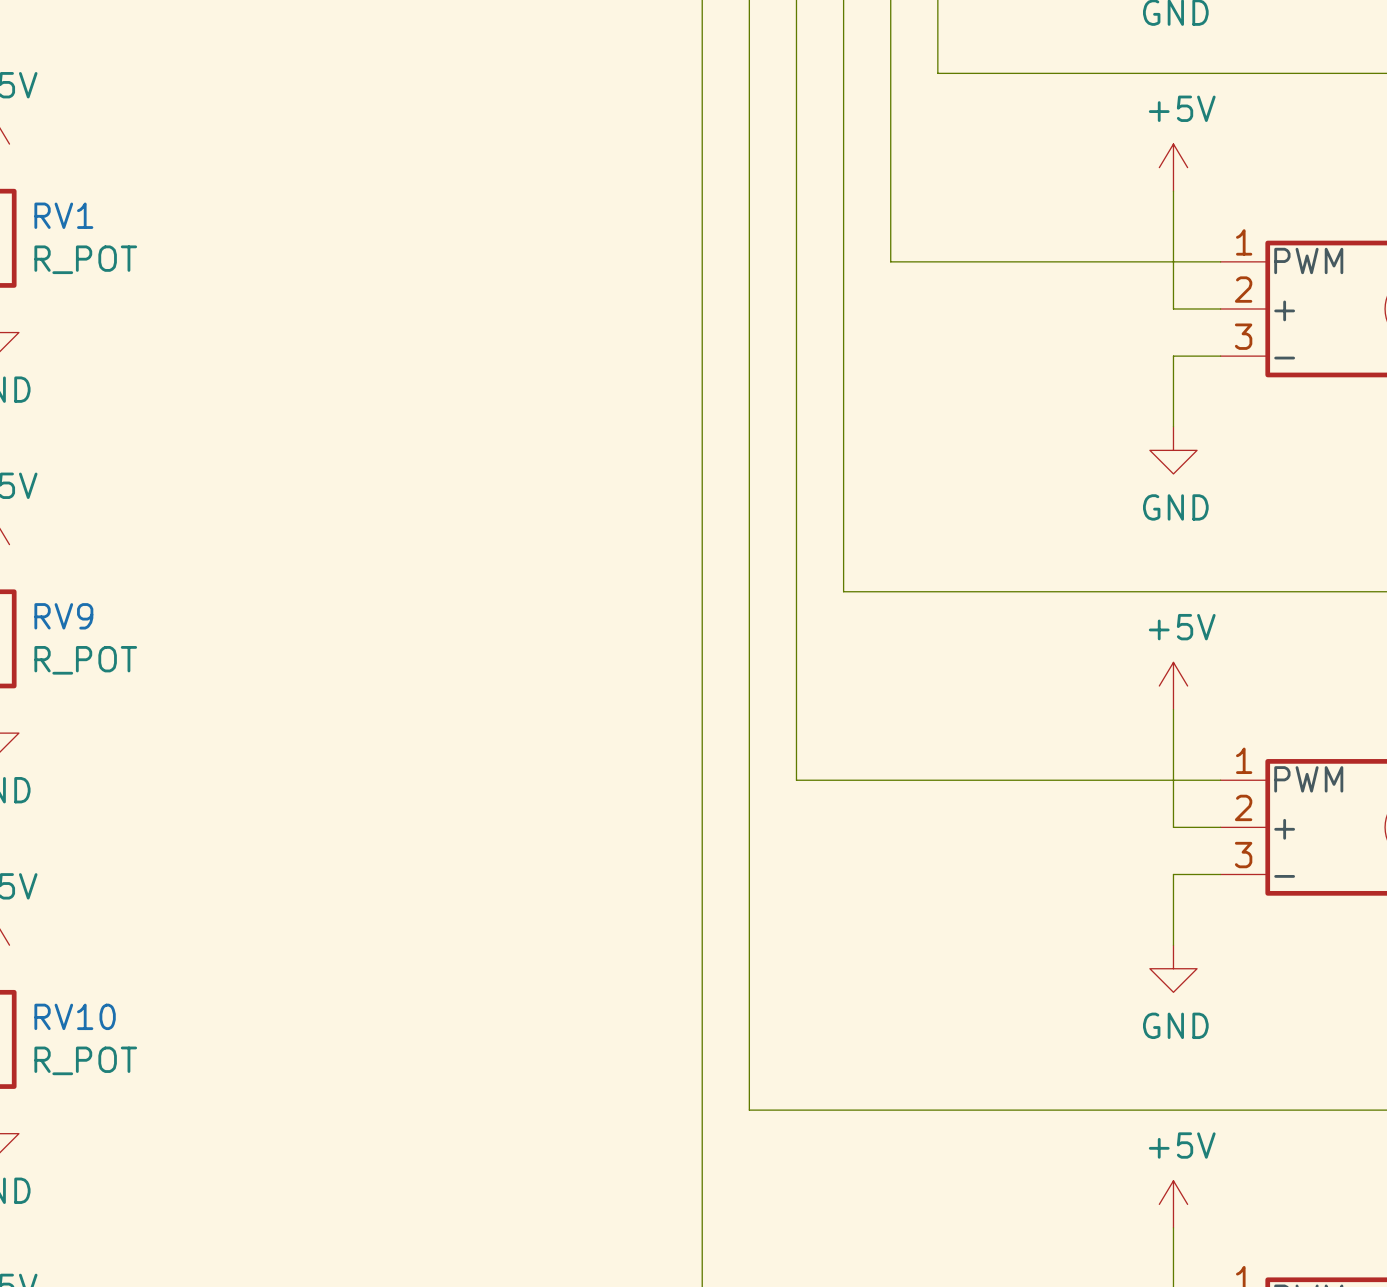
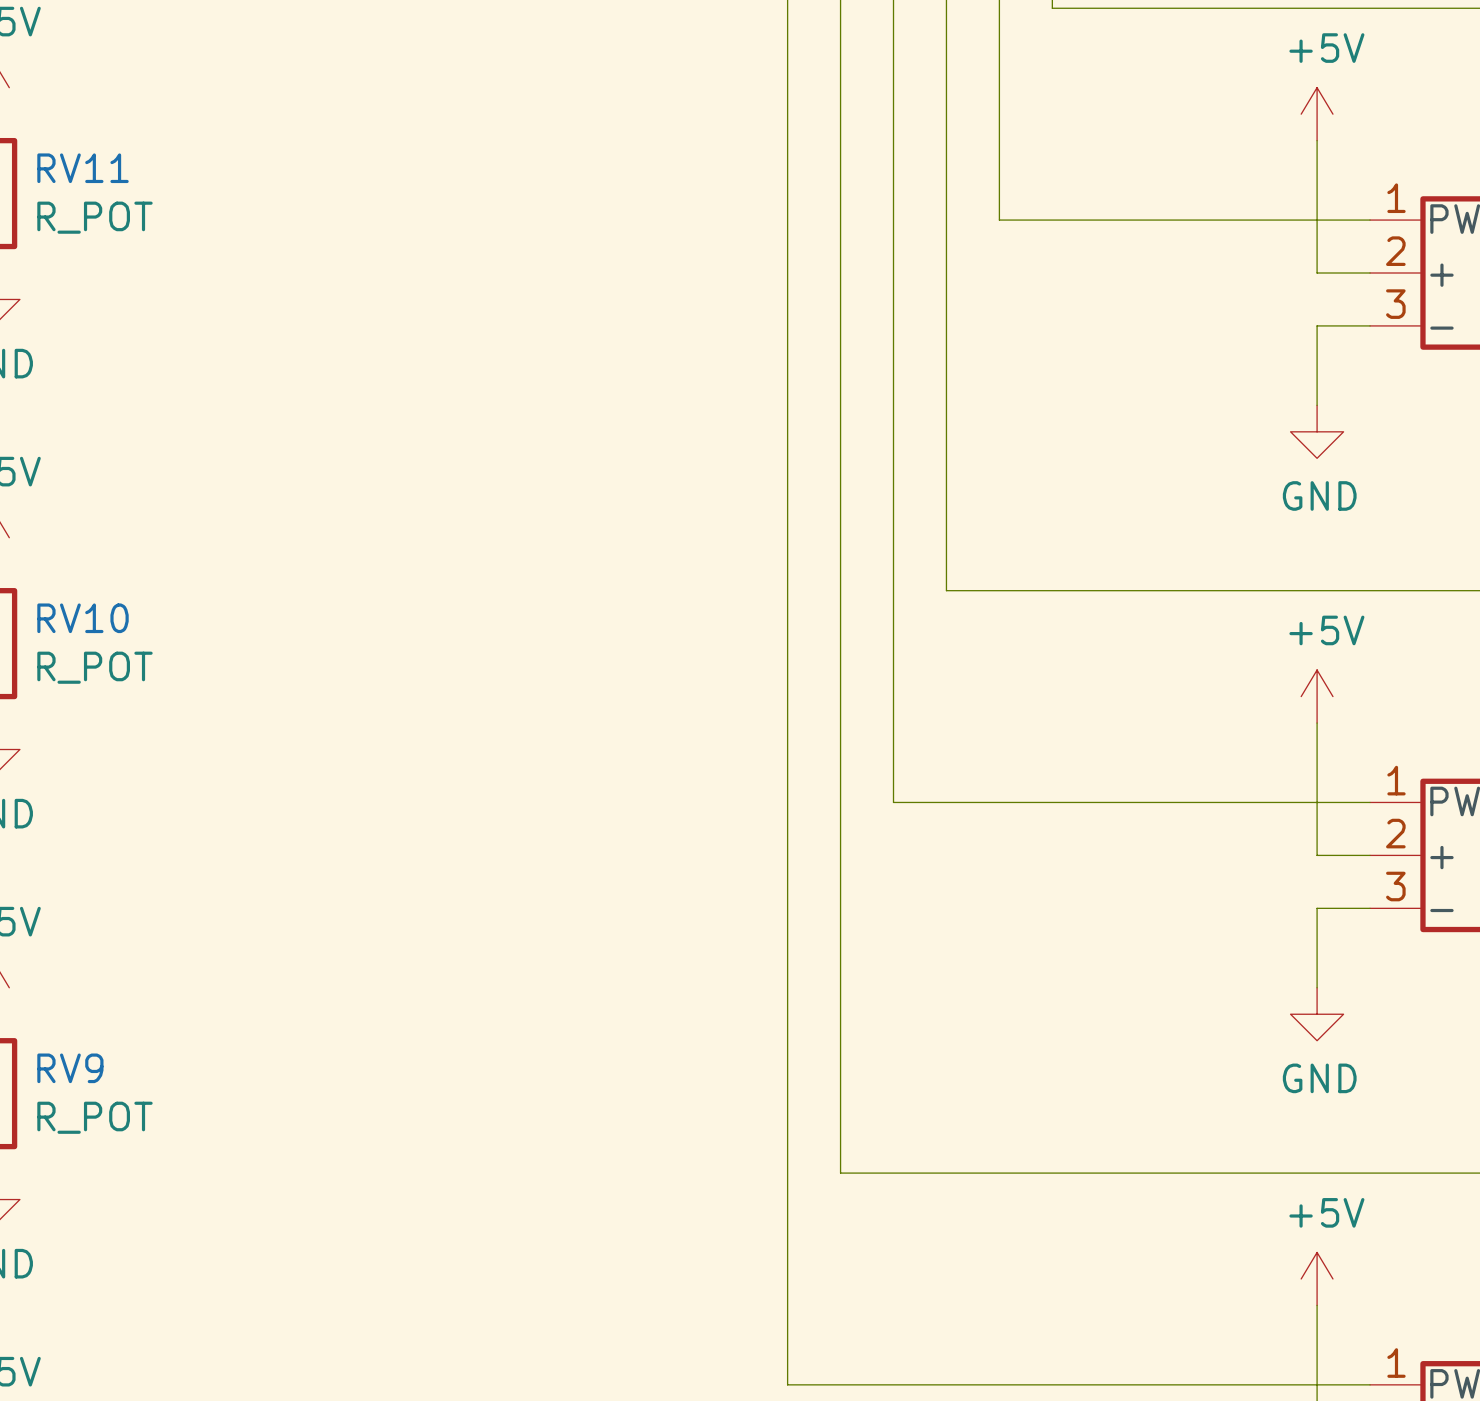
RV1 name: RV1 (63, 215) -> RV11 (83, 168)
RV9 name: RV9 (63, 616) -> RV10 (83, 618)
RV10 name: RV10 (75, 1016) -> RV9 (70, 1068)

